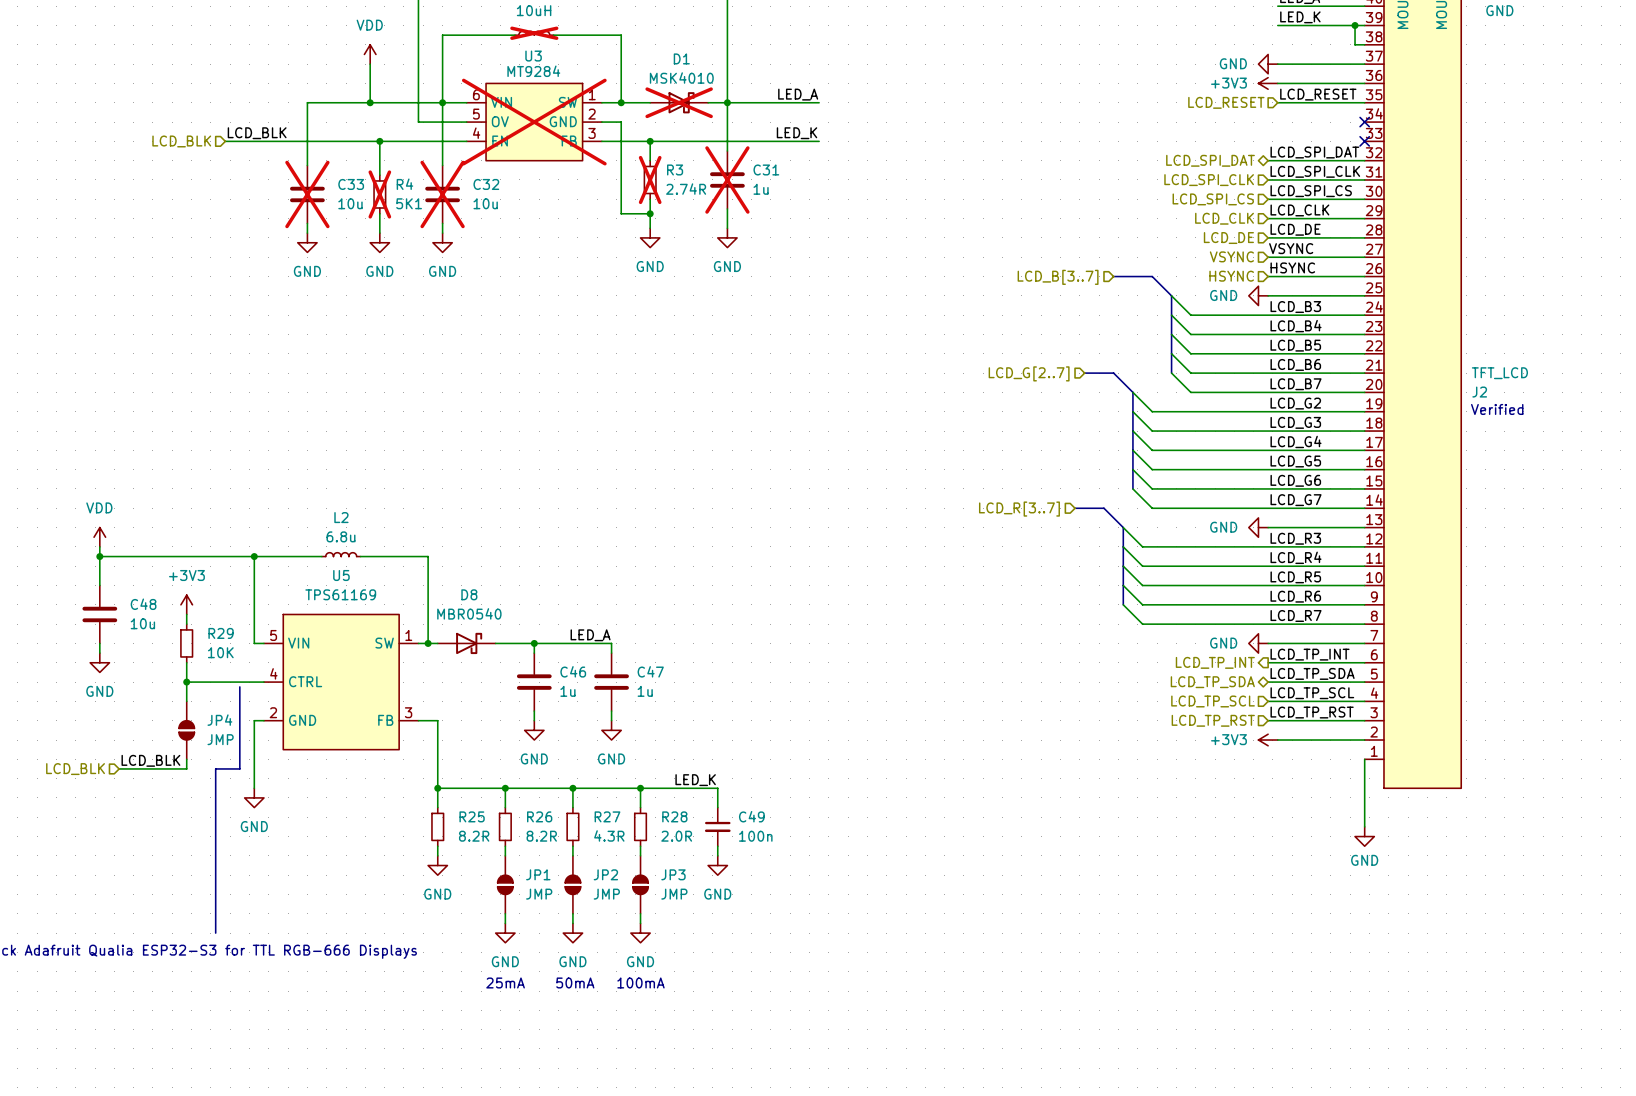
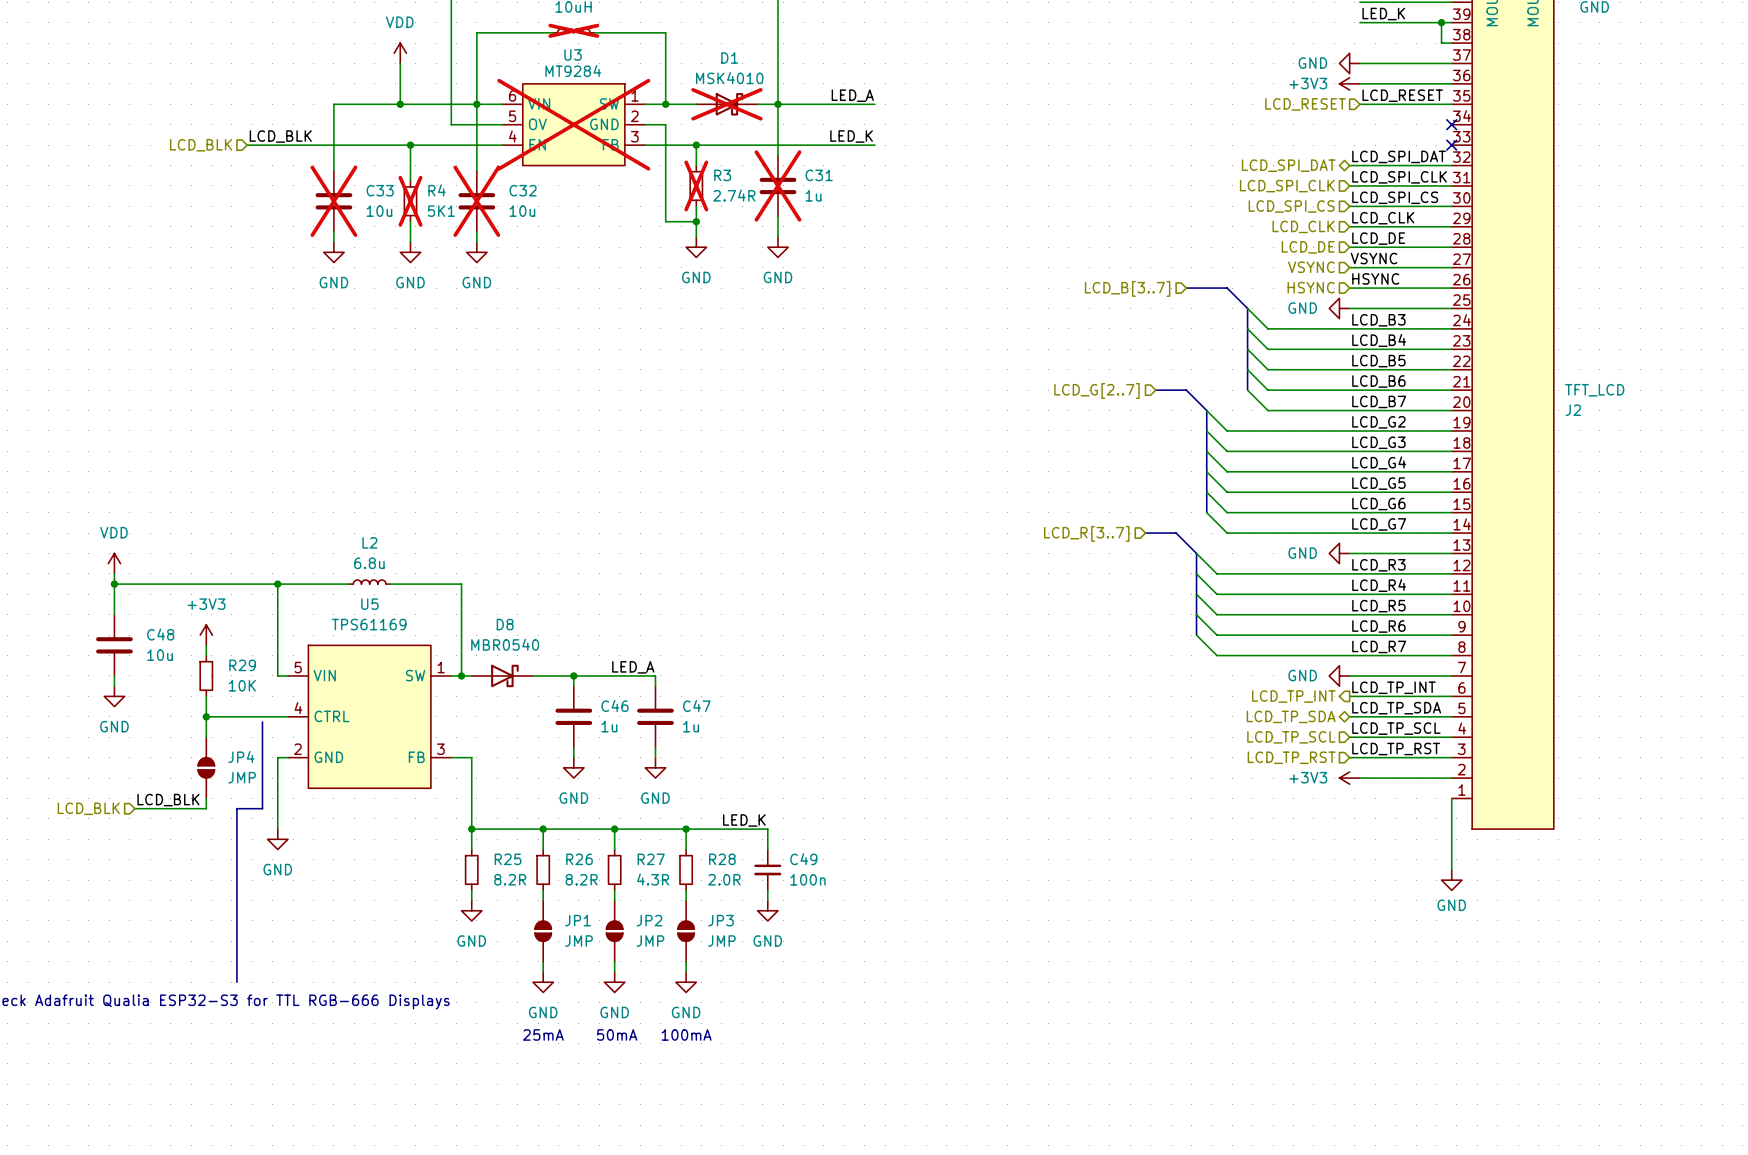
text: Verified (1497, 409) -> none

